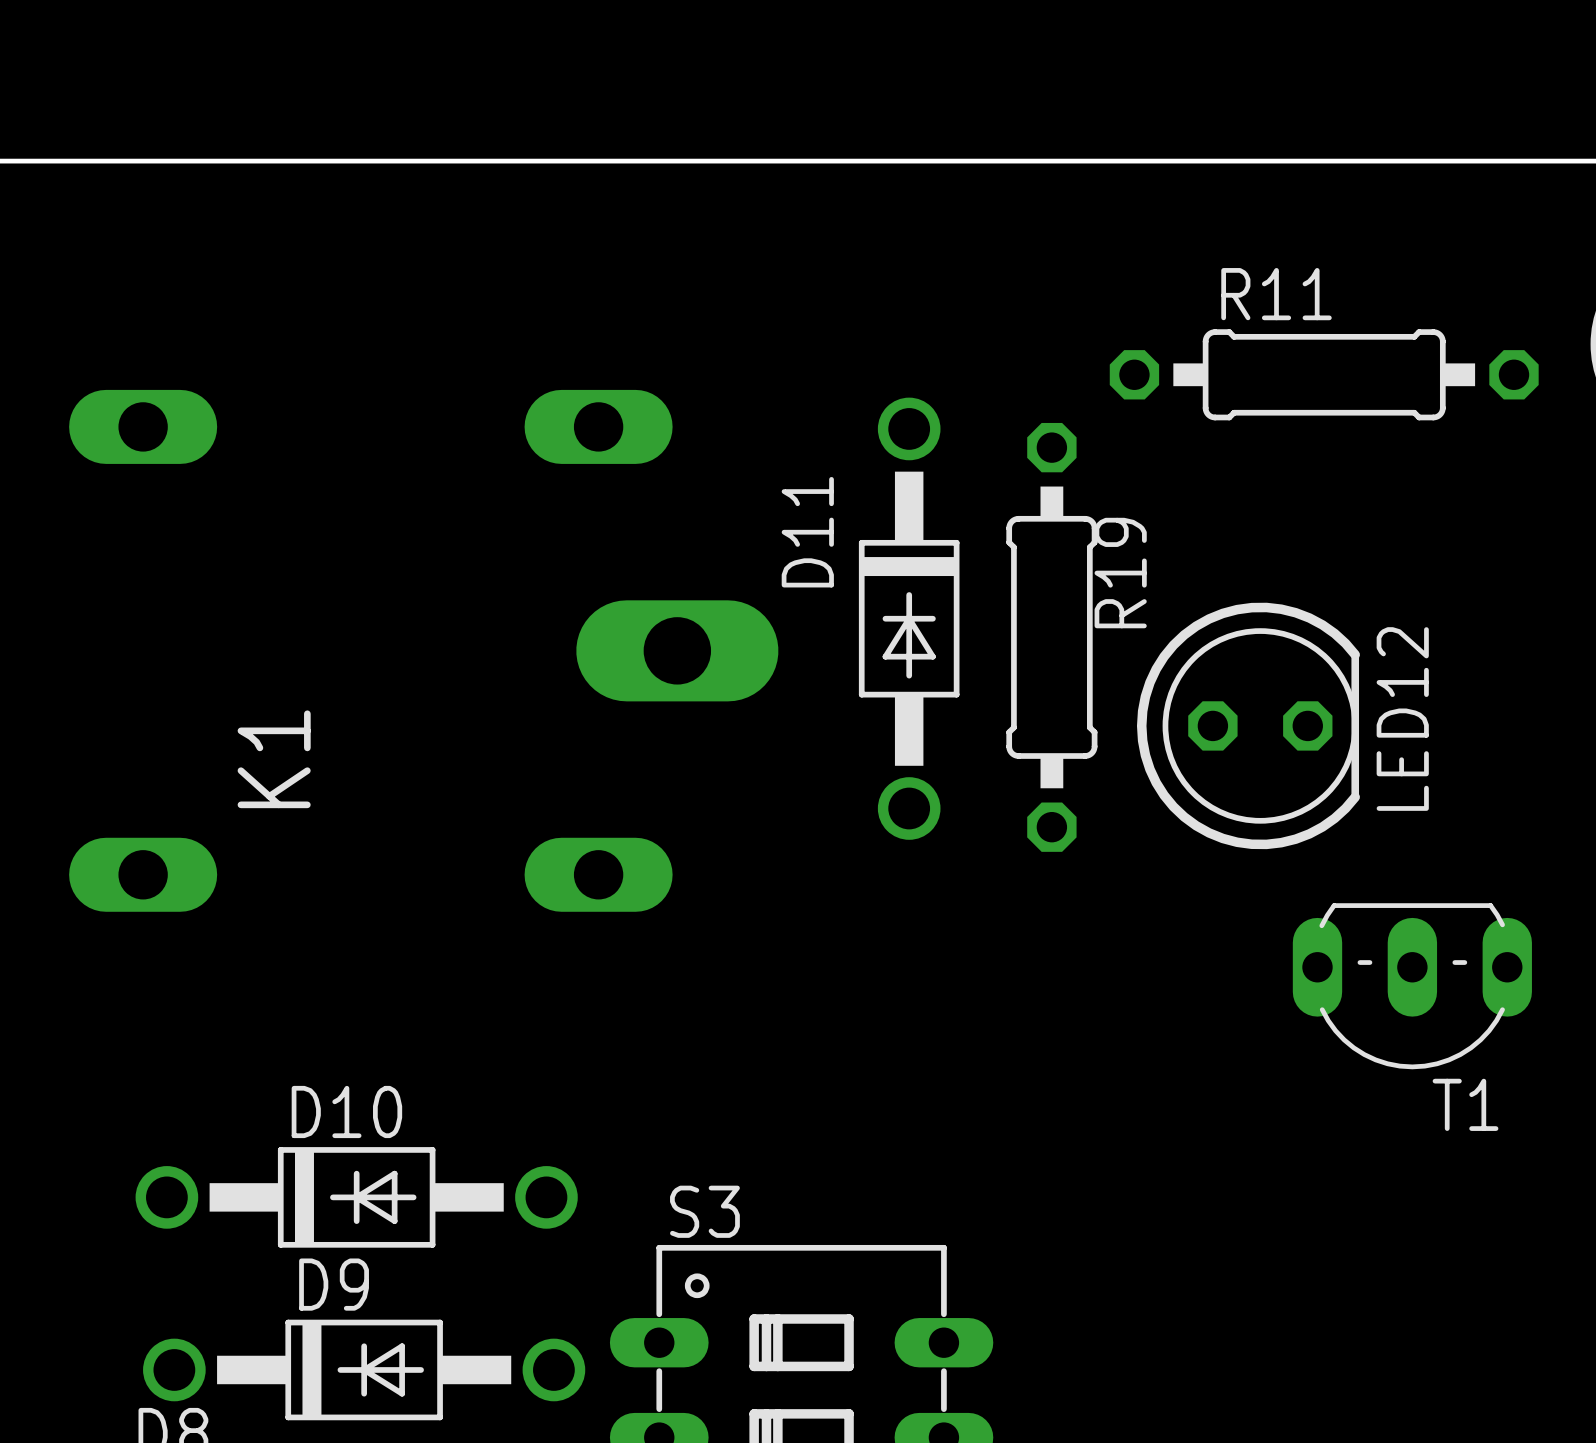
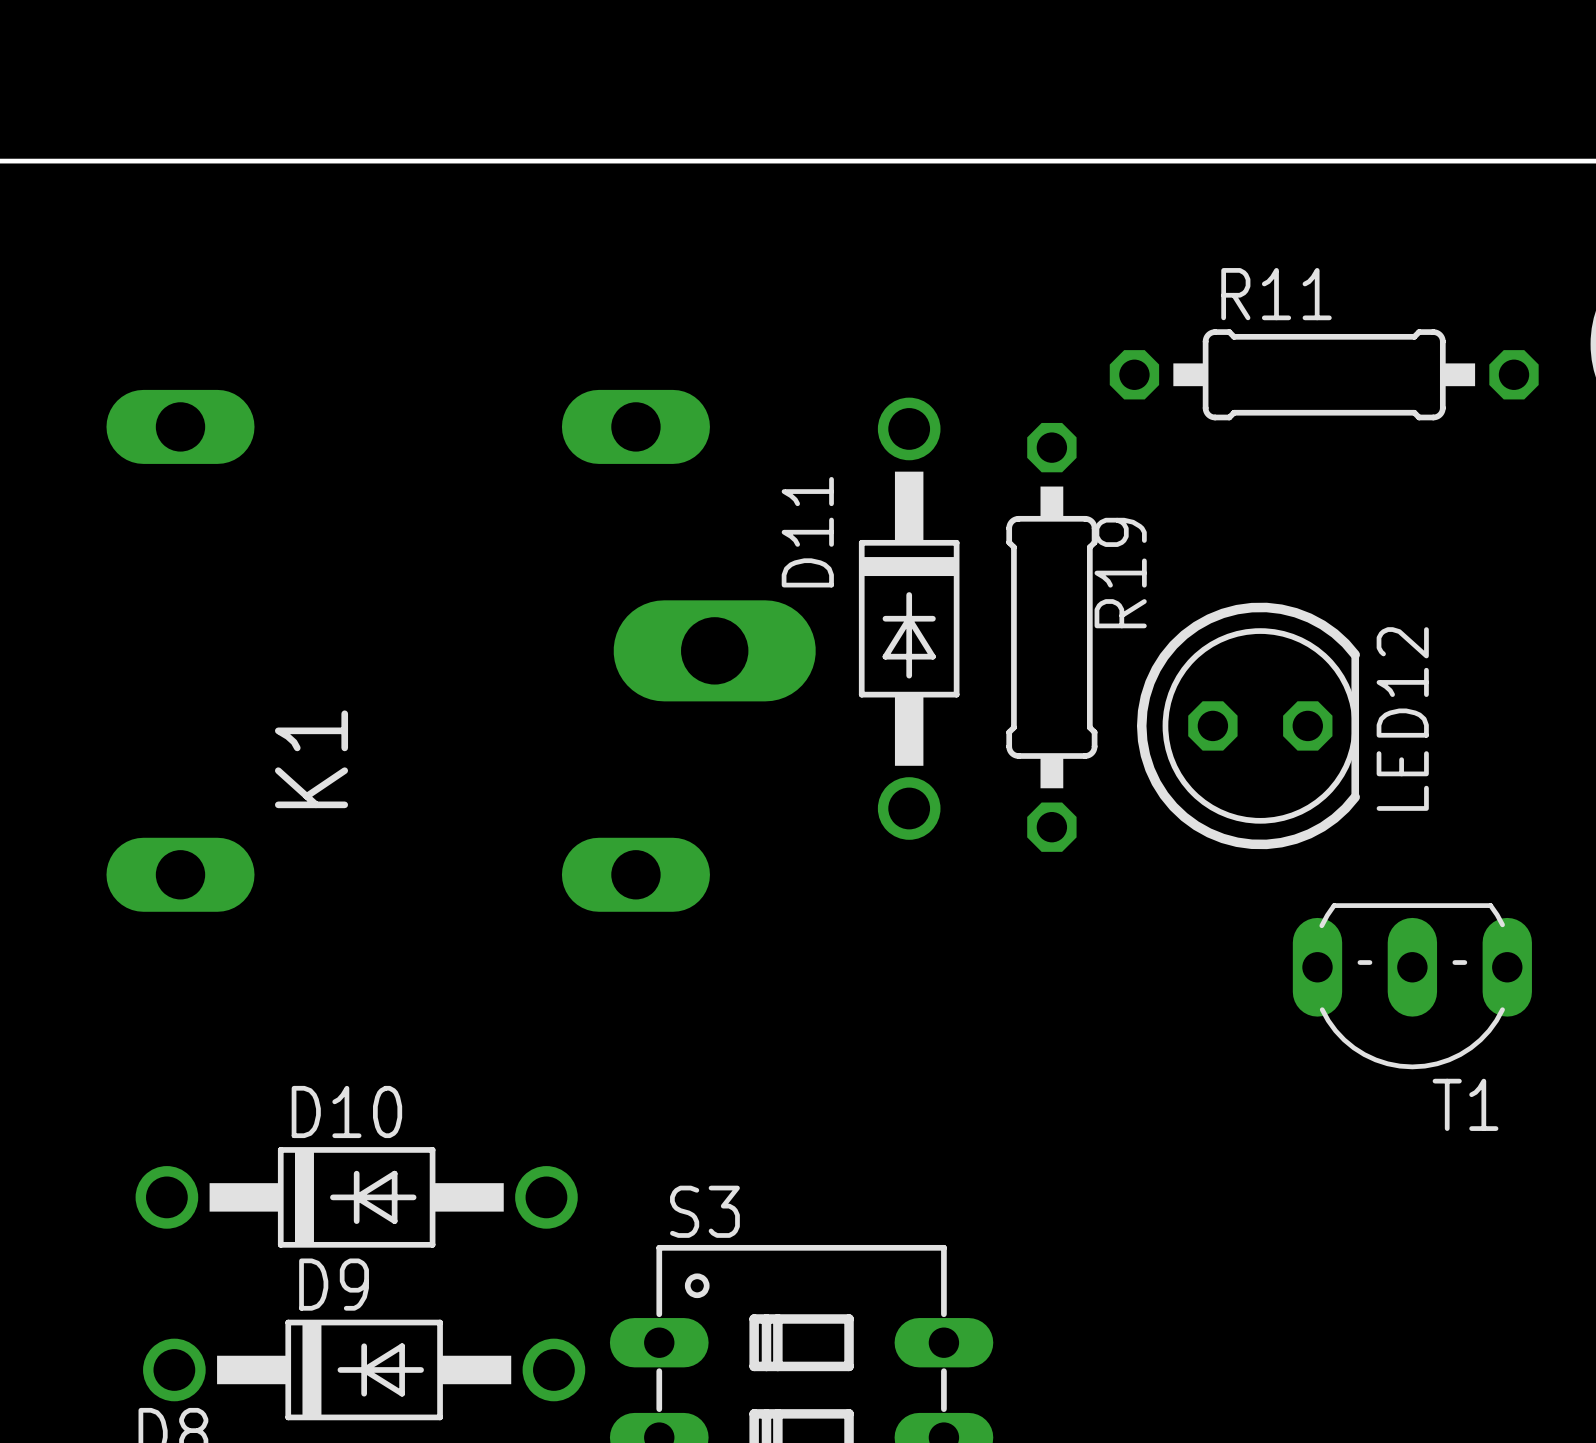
K1 position: (423, 650) -> (461, 650)

